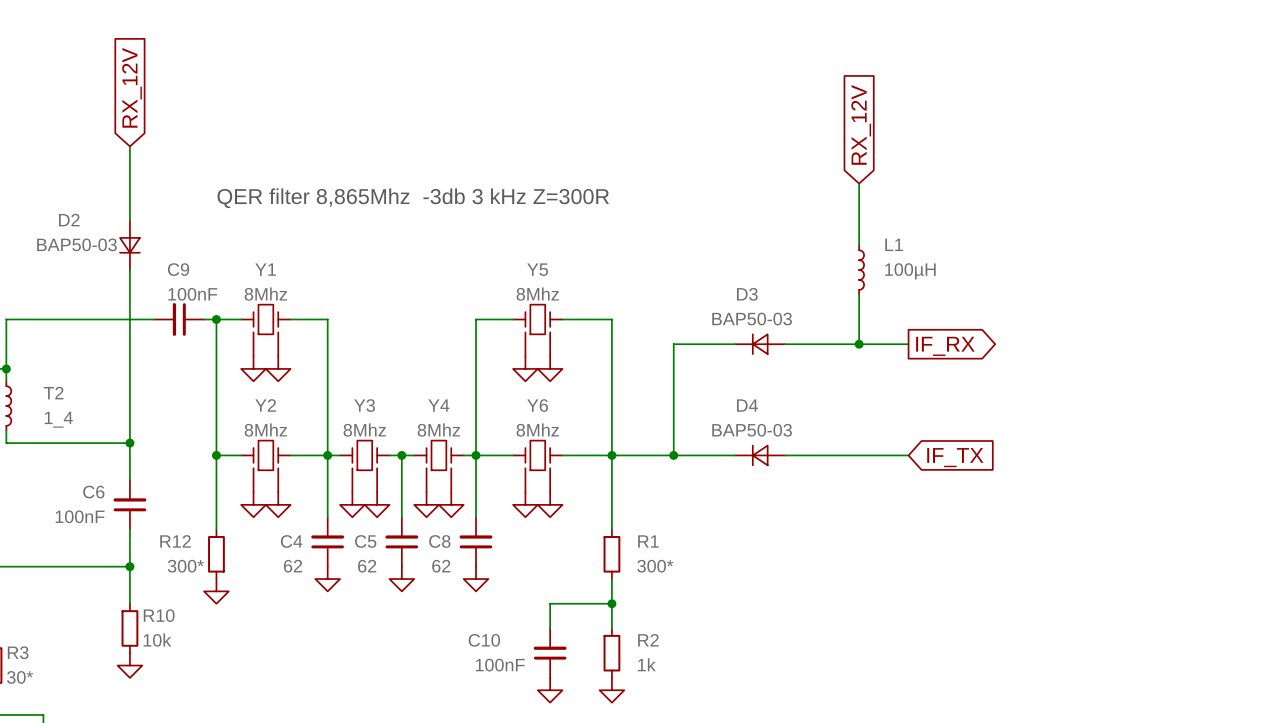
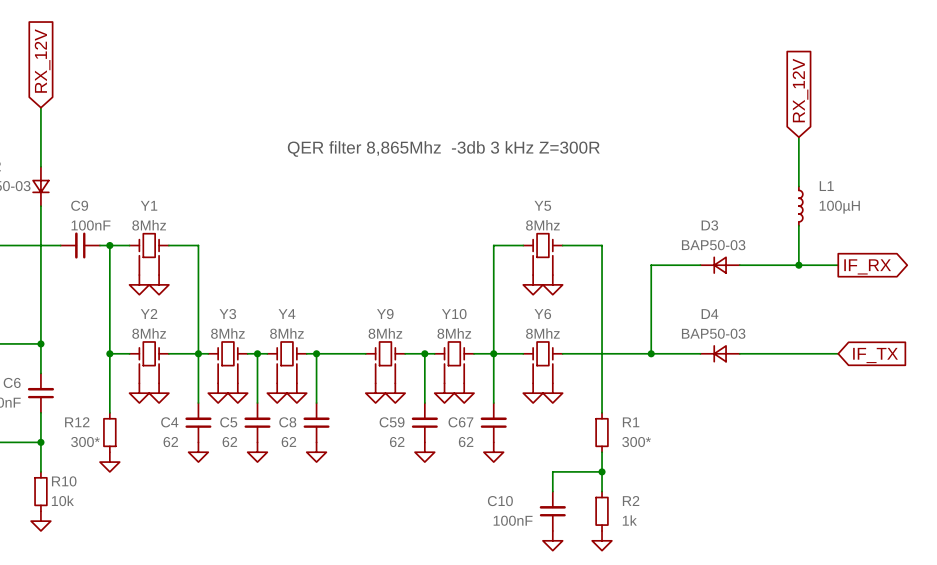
global label position: RX_12V (861, 124) -> RX_12V (800, 90)
wire: (859, 183) (859, 245) -> (798, 137) (798, 186)
text position: QER filter 8,865Mhz -3db 3 kHz Z=300R (413, 198) -> QER filter 8,865Mhz -3db 3 kHz Z=300R (443, 148)
L1 position: (861, 270) -> (800, 206)
wire: (859, 294) (859, 344) -> (798, 225) (798, 265)
wire: (513, 319) (475, 319) (475, 455) -> none
wire: (562, 319) (611, 319) (611, 455) -> none
wire: none -> (523, 245) (493, 245) (493, 403)
wire: none -> (562, 245) (602, 245) (602, 412)
Y5 position: (537, 330) -> (542, 254)
wire: (735, 344) (673, 344) (673, 455) (624, 455) -> none
D3 position: (760, 344) -> (720, 265)
wire: (784, 344) (896, 344) -> (651, 353) (651, 265)
junction: (859, 344) -> none
wire: none -> (661, 265) (700, 265)
wire: none -> (739, 265) (838, 265)
junction: none -> (798, 265)
global label position: IF_RX (945, 346) -> IF_RX (867, 266)
power symbol: (525, 368) -> none
power symbol: (550, 368) -> none
power symbol: none -> (533, 284)
power symbol: none -> (552, 284)
junction position: (673, 455) -> (493, 353)
D4 position: (760, 455) -> (720, 353)
junction: none -> (651, 353)
wire: none -> (661, 353) (700, 353)
wire: none -> (739, 353) (838, 353)
global label position: IF_TX (955, 457) -> IF_TX (875, 355)
Y6 position: (537, 466) -> (542, 362)
Y9: none -> 8Mhz (385, 362)
Y10: none -> 8Mhz (454, 362)
power symbol position: (525, 504) -> (395, 393)
power symbol: none -> (444, 393)
power symbol: none -> (464, 393)
power symbol: none -> (533, 393)
power symbol: none -> (552, 393)
C59: none -> 62 (424, 422)
C67: none -> 62 (493, 422)
R1 position: (611, 554) -> (602, 432)
wire: (611, 579) (611, 628) -> (602, 452) (602, 491)
power symbol: none -> (424, 452)
power symbol: none -> (493, 452)
wire: (611, 603) (550, 603) (550, 628) -> (602, 471) (552, 471) (552, 491)
junction: (611, 603) -> none
junction: none -> (602, 471)
C10 position: (550, 653) -> (552, 511)
R2 position: (611, 653) -> (602, 511)
power symbol: (550, 690) -> none
power symbol: (611, 690) -> none
power symbol: none -> (552, 540)
power symbol: none -> (602, 540)

